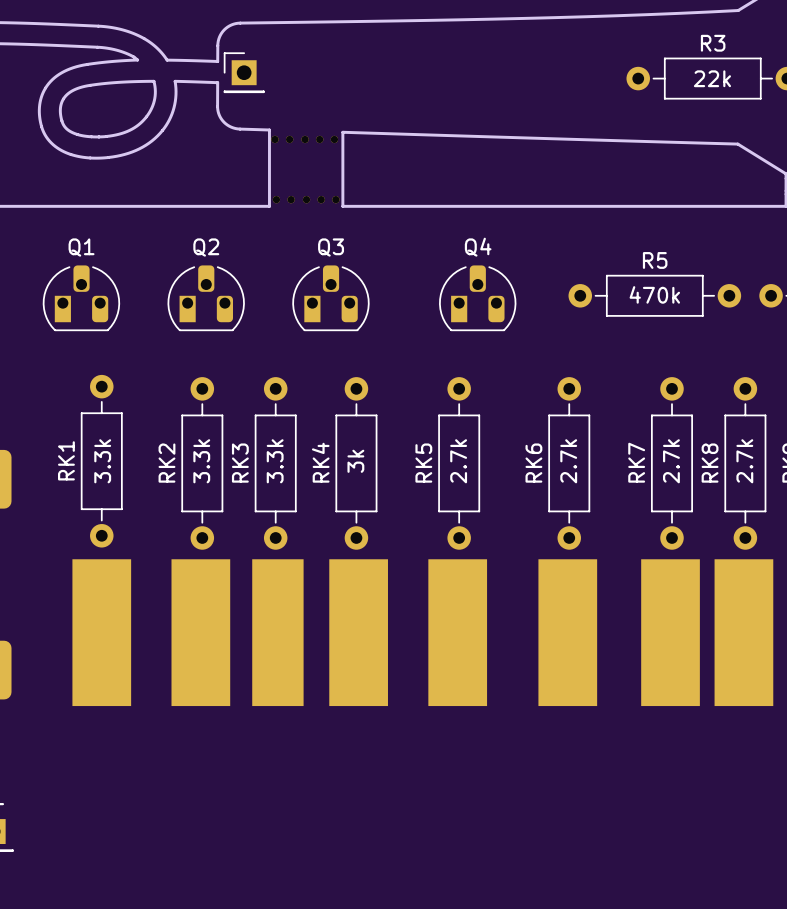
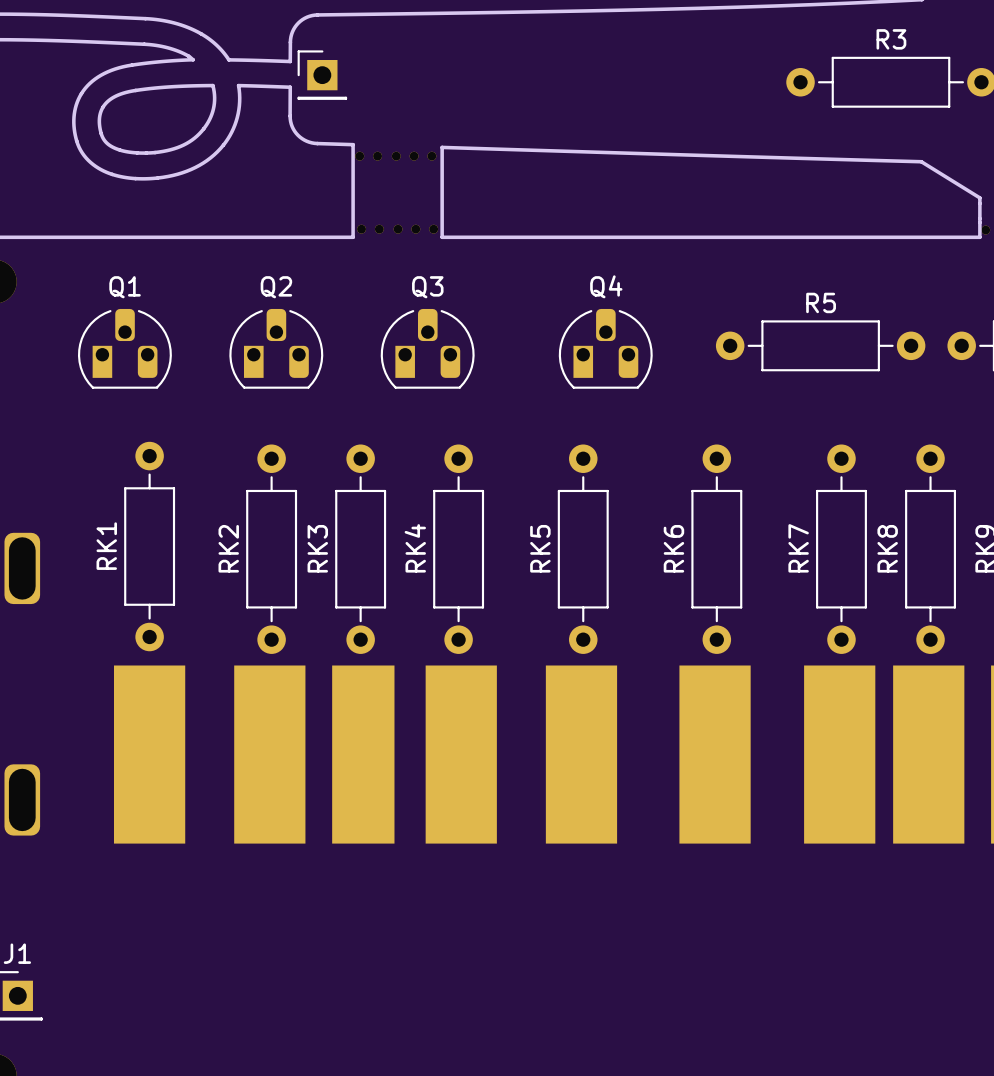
R3 value: 22k (712, 78) -> none
R5 value: 470k (654, 294) -> none
RK1 value: 3.3k (102, 461) -> none
RK2 value: 3.3k (201, 461) -> none
RK3 value: 3.3k (275, 461) -> none
RK4 value: 3k (355, 461) -> none
RK5 value: 2.7k (458, 461) -> none
RK6 value: 2.7k (568, 461) -> none
RK7 value: 2.7k (671, 461) -> none
RK8 value: 2.7k (744, 461) -> none

